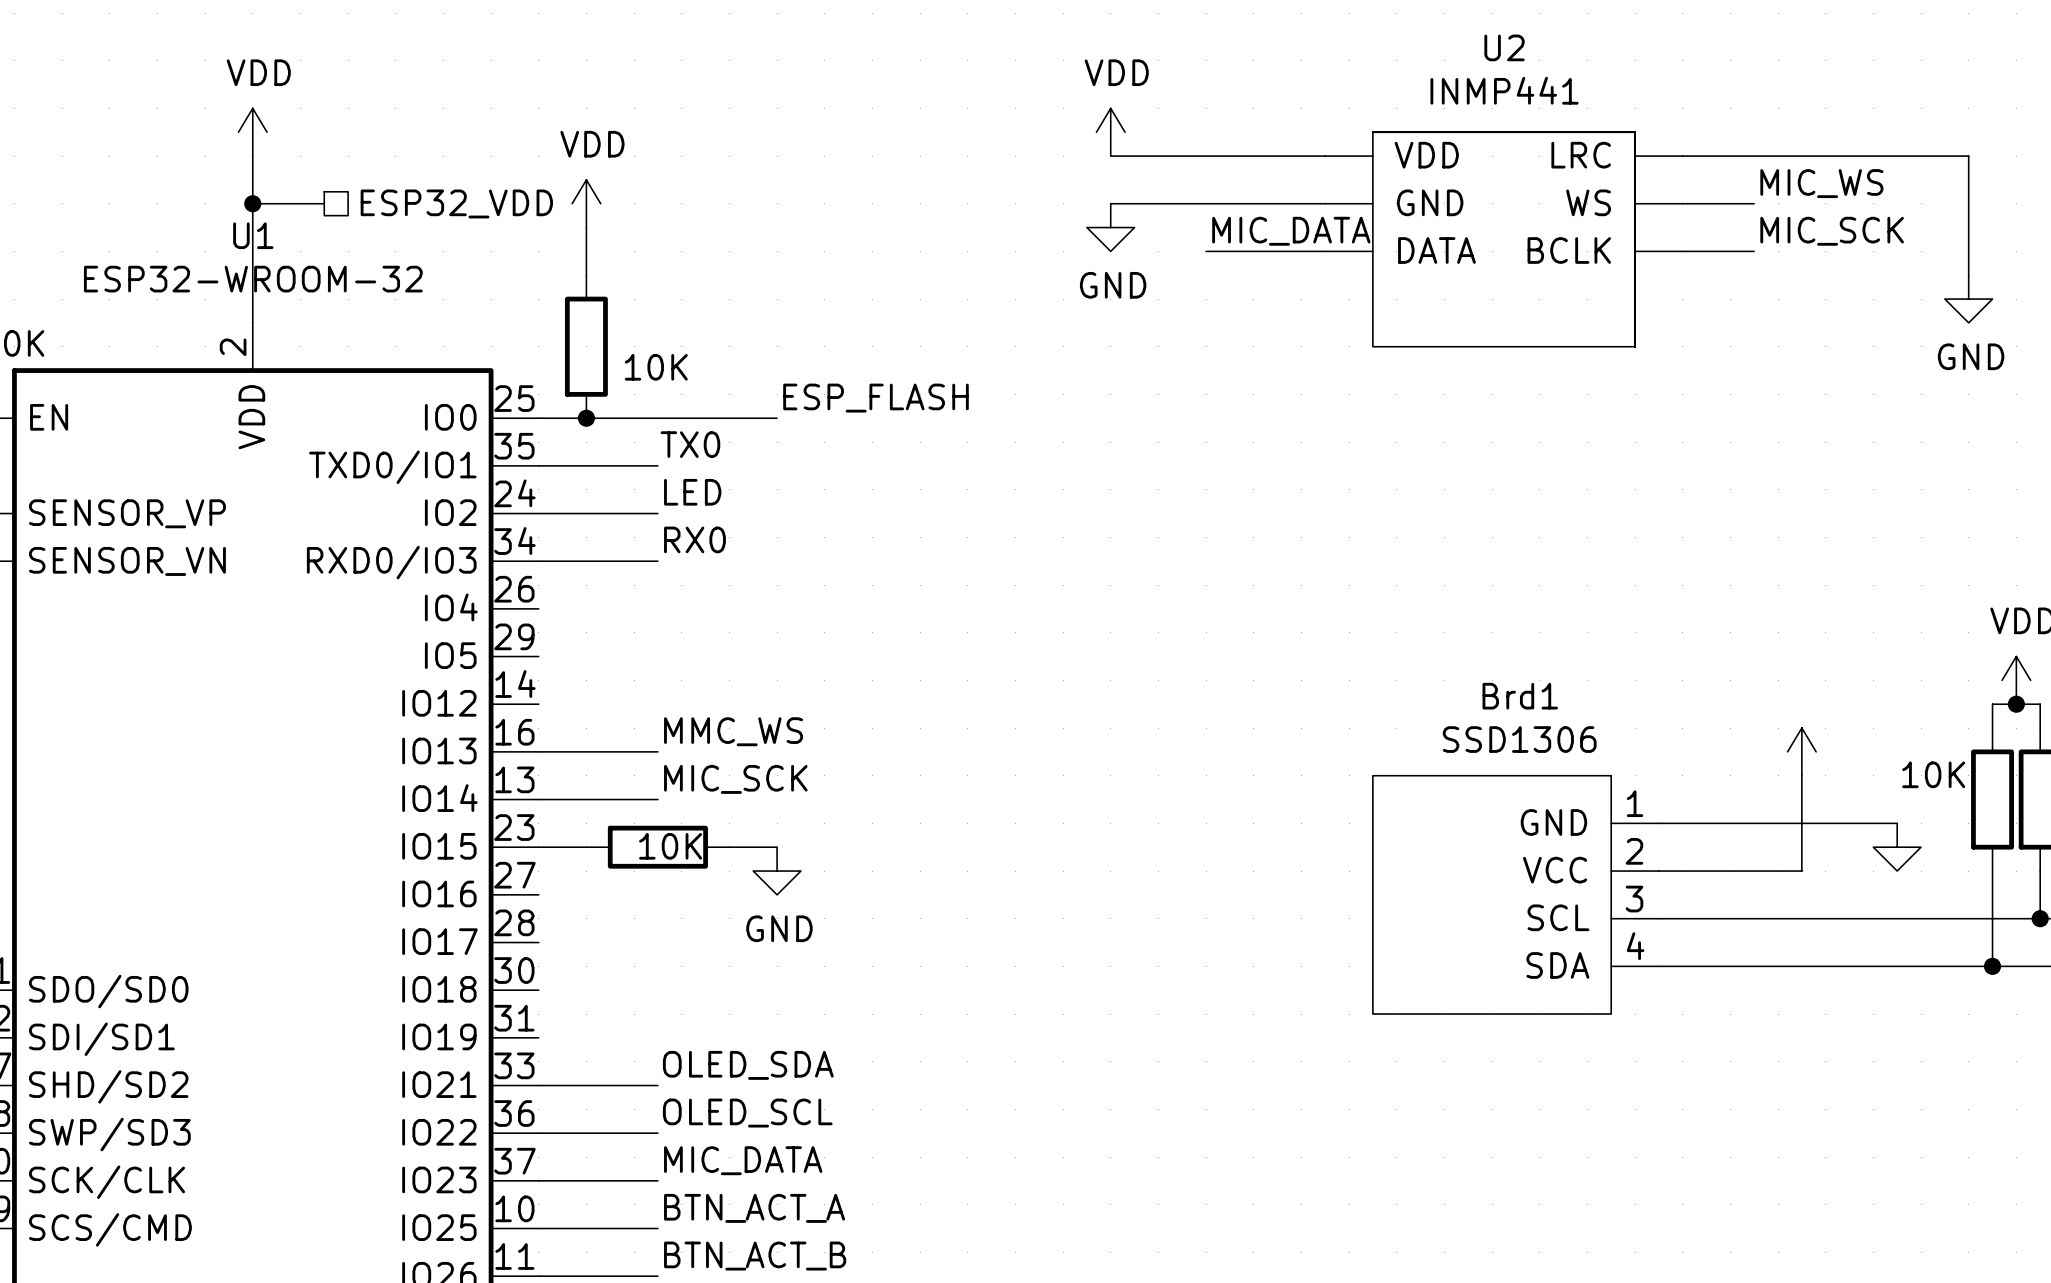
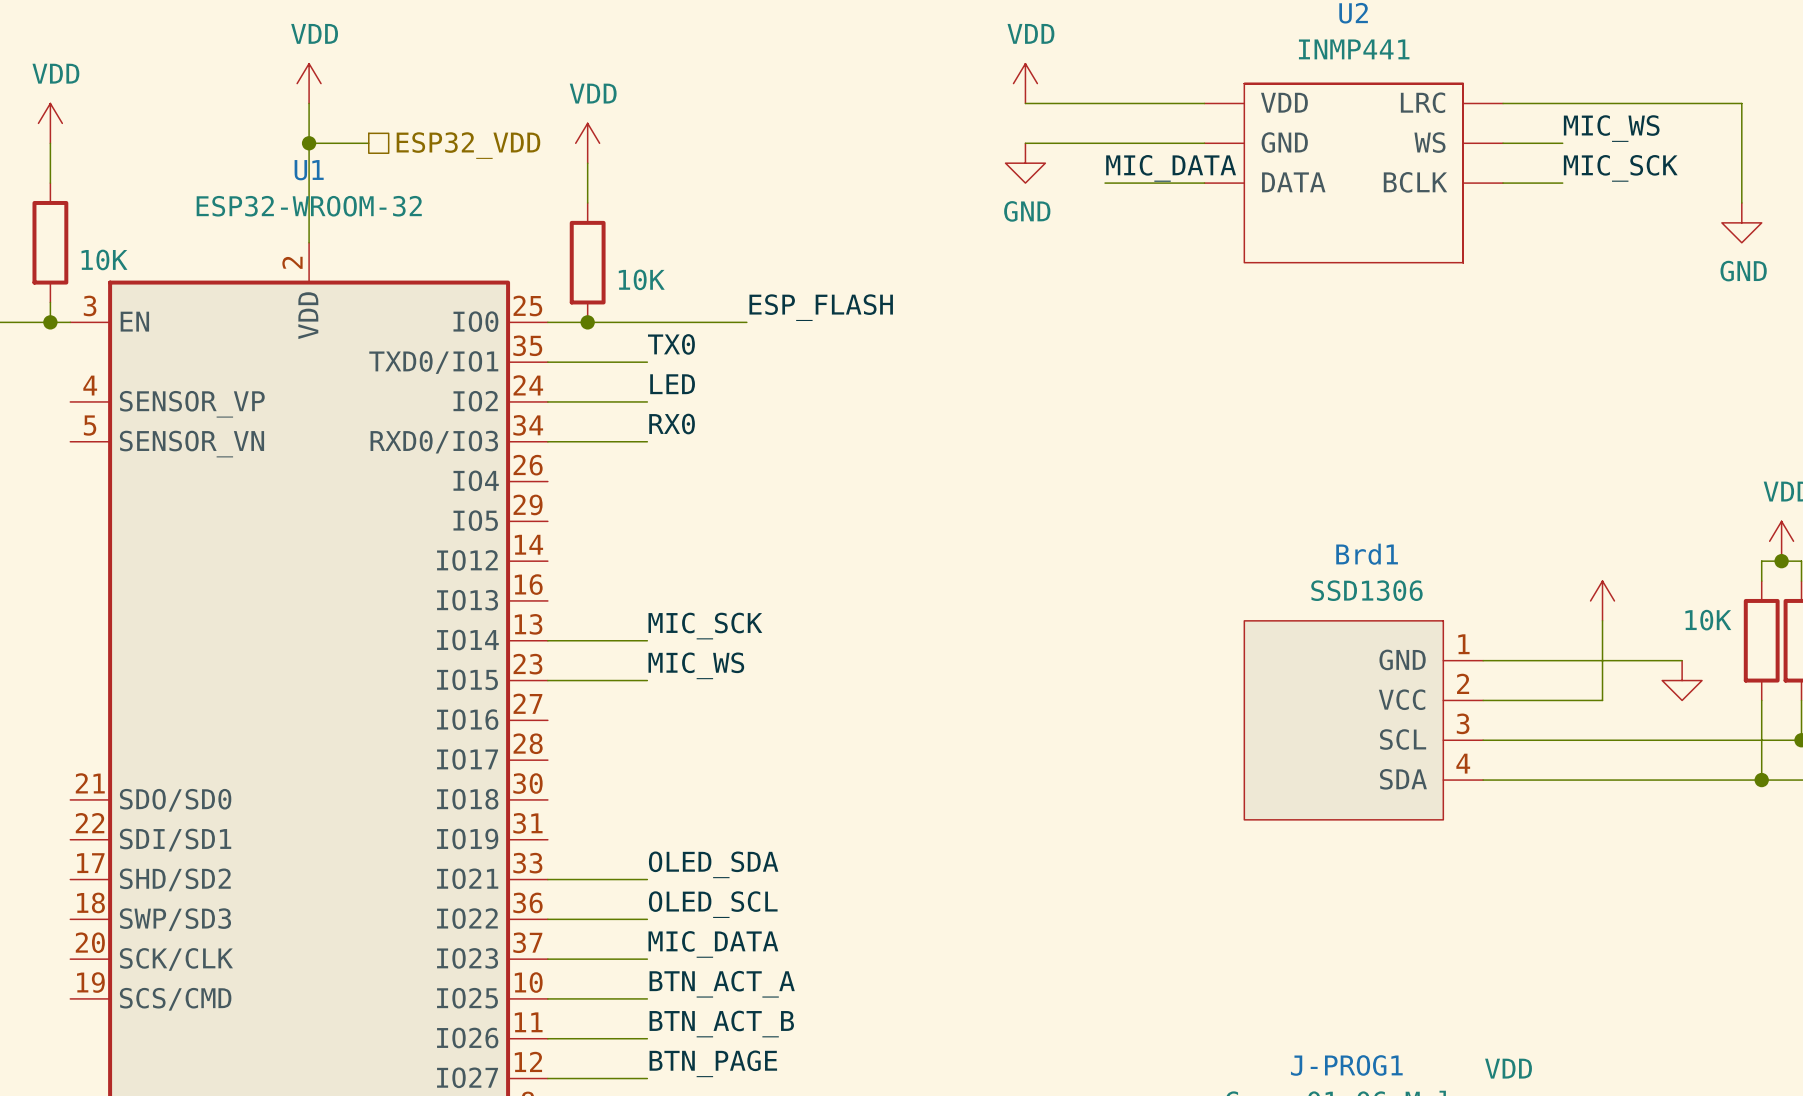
label: MMC_WS (733, 731) -> none
wire: (538, 751) (657, 751) -> none
label: none -> MIC_WS (696, 665)
wire: none -> (587, 680) (647, 680)
part: 10K (657, 847) -> none
wire: (729, 847) (777, 847) -> none
power symbol: GND (777, 871) -> none

